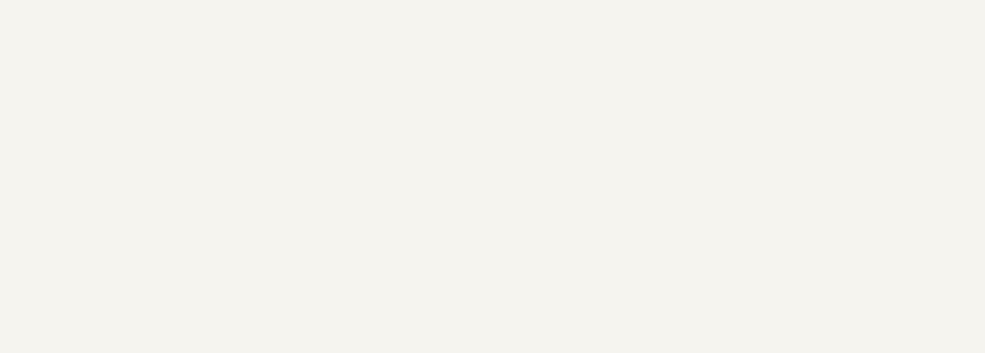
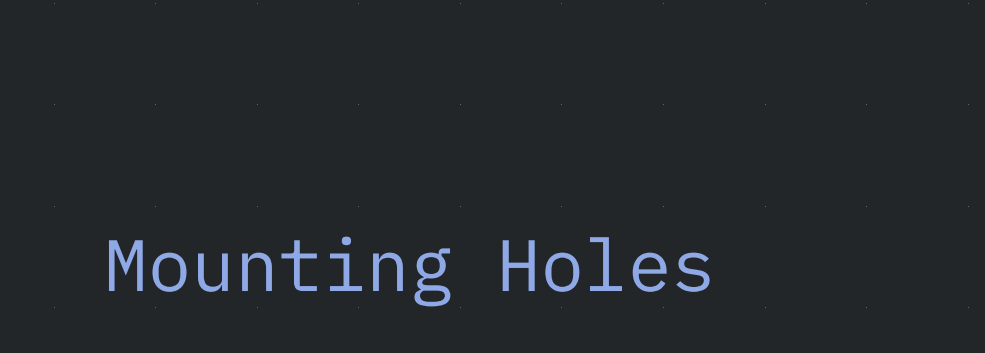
text: none -> Mounting Holes (409, 271)

